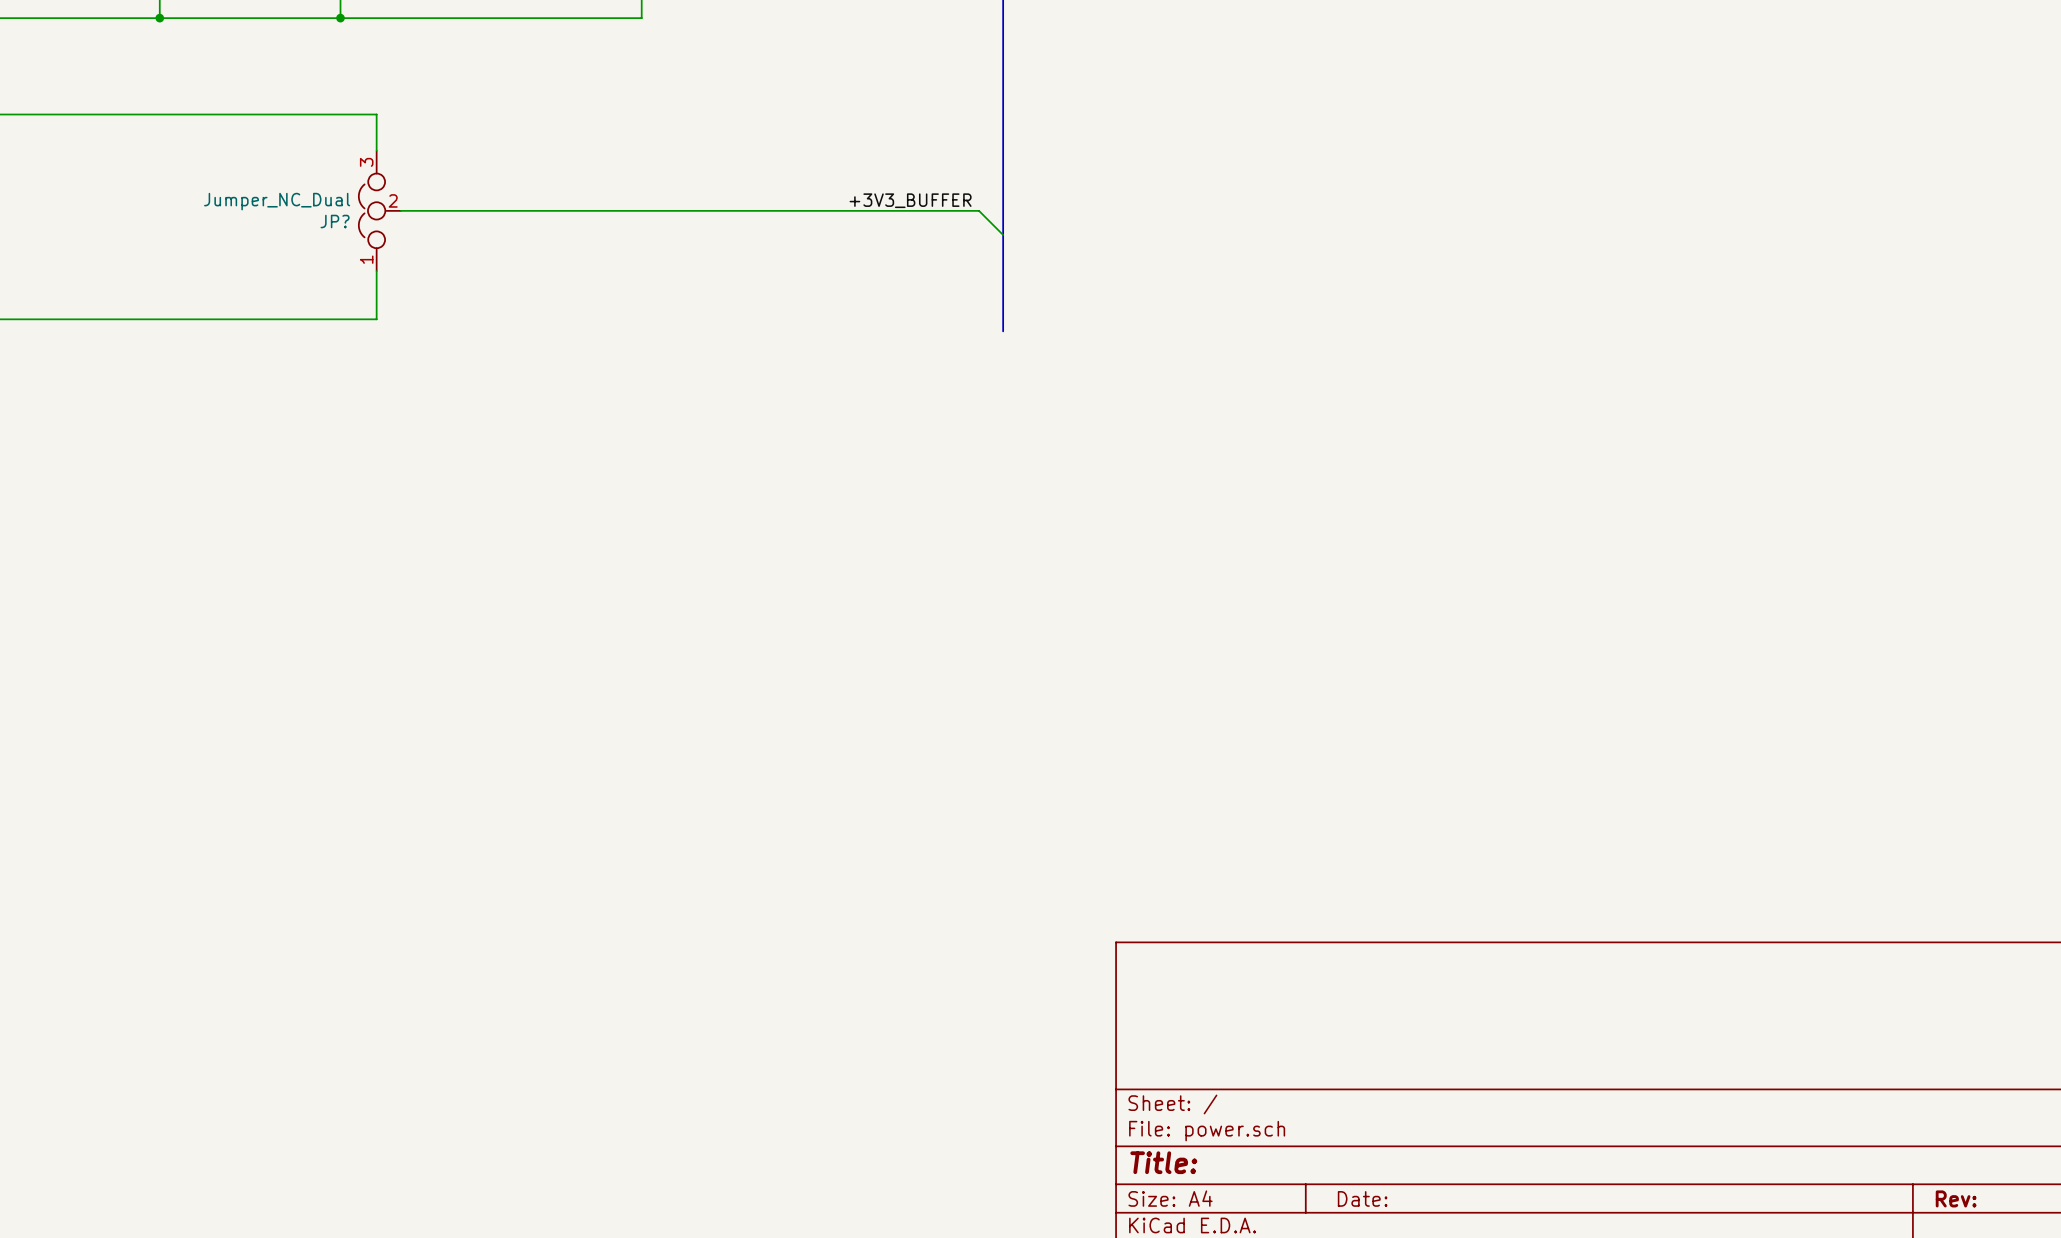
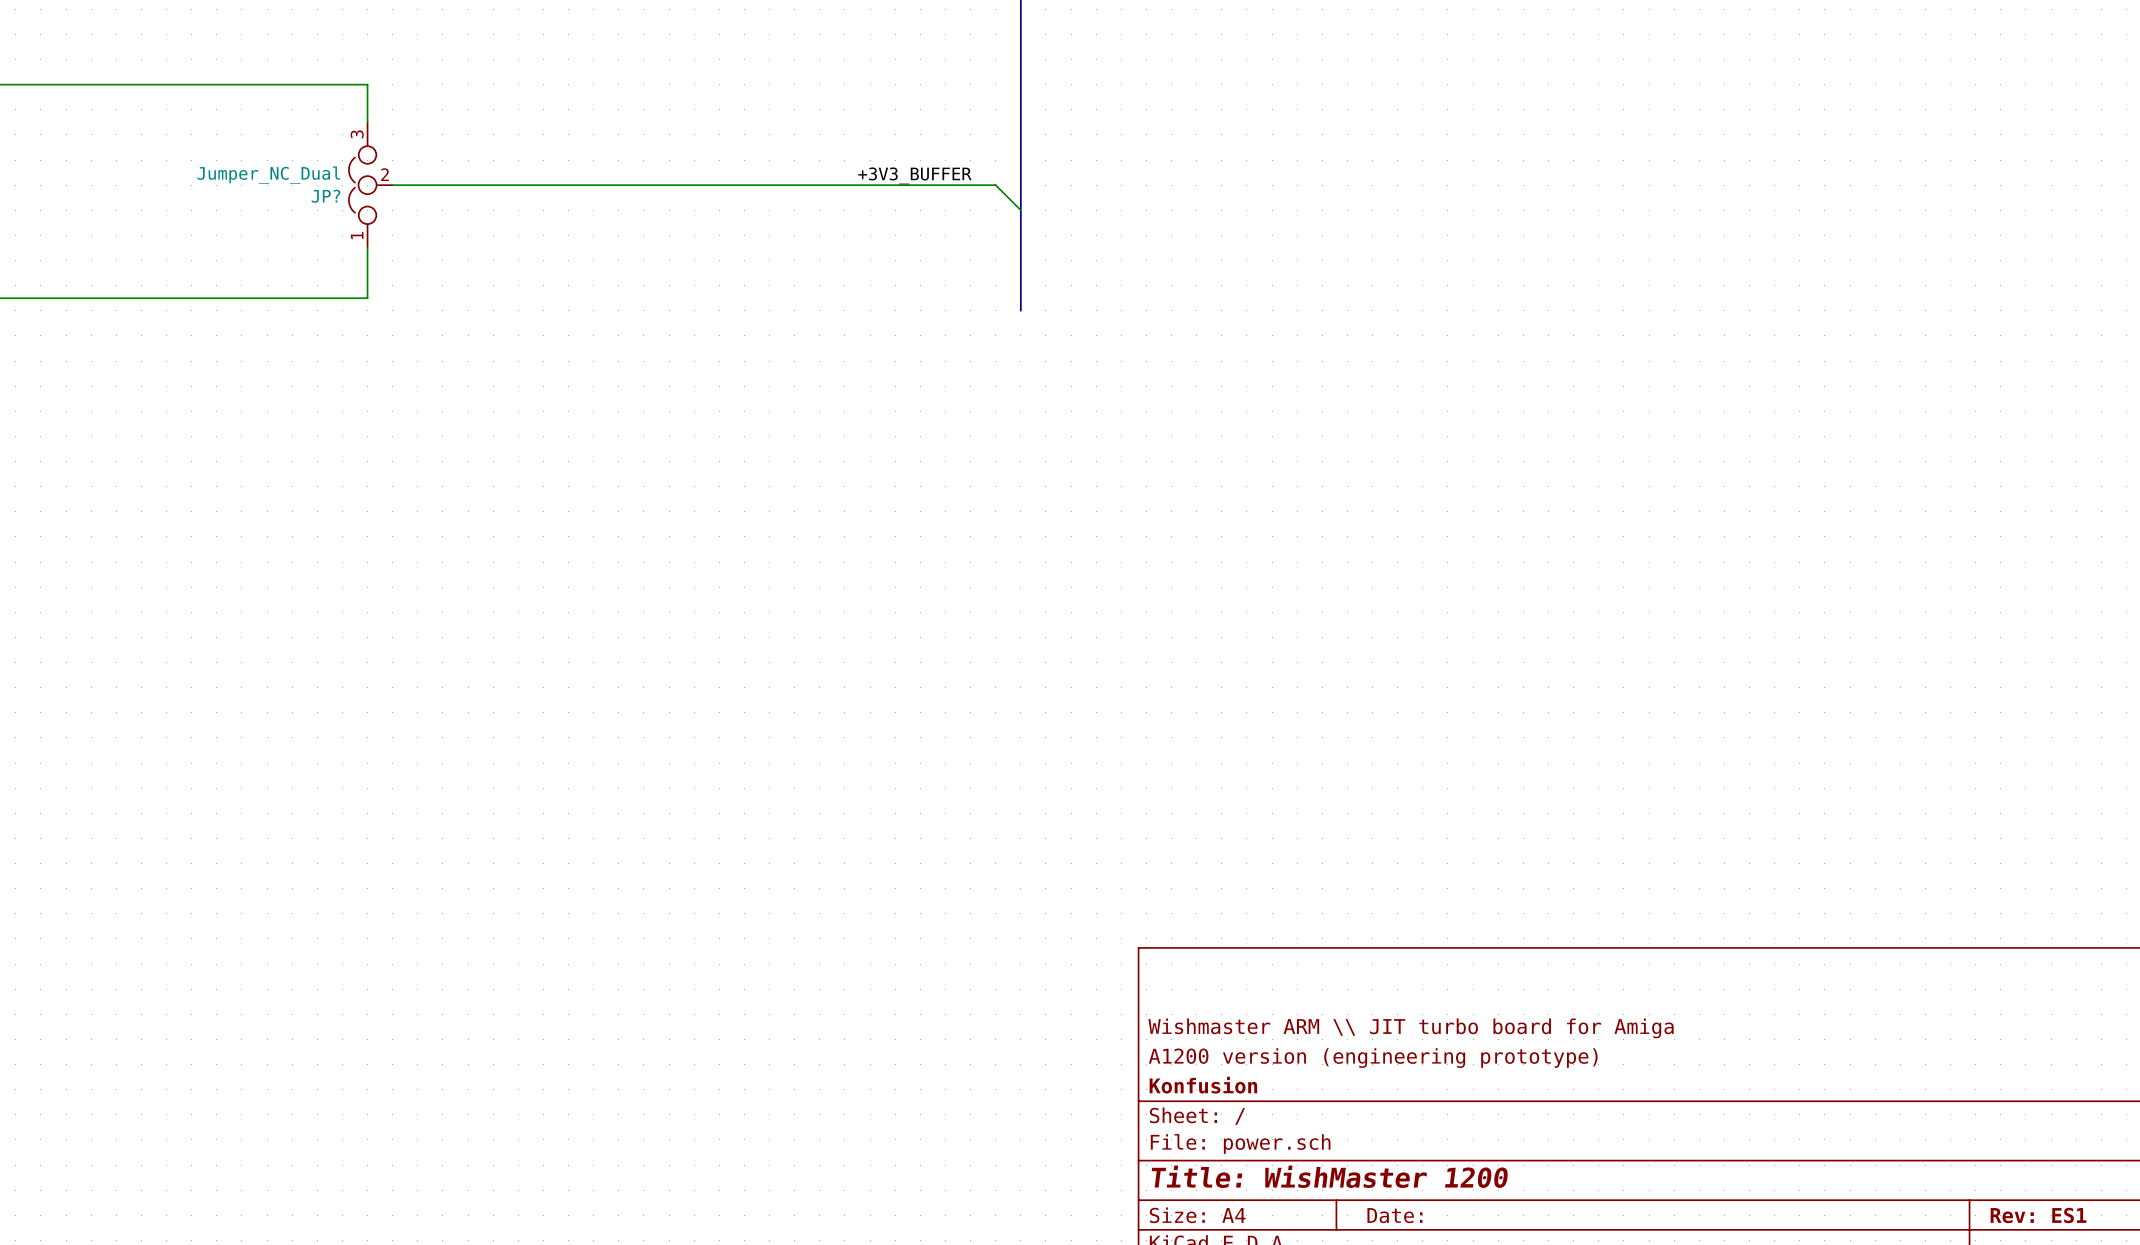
title block: none -> Wishmaster ARM \\ JIT turbo board for Amiga (1411, 1028)
title block: none -> A1200 version (engineering prototype) (1373, 1058)
title block: none -> Konfusion (1203, 1085)
title block: Title: (1163, 1162) -> Title: WishMaster 1200 (1329, 1176)
title block: Rev: (1956, 1198) -> Rev: ES1 (2038, 1215)

